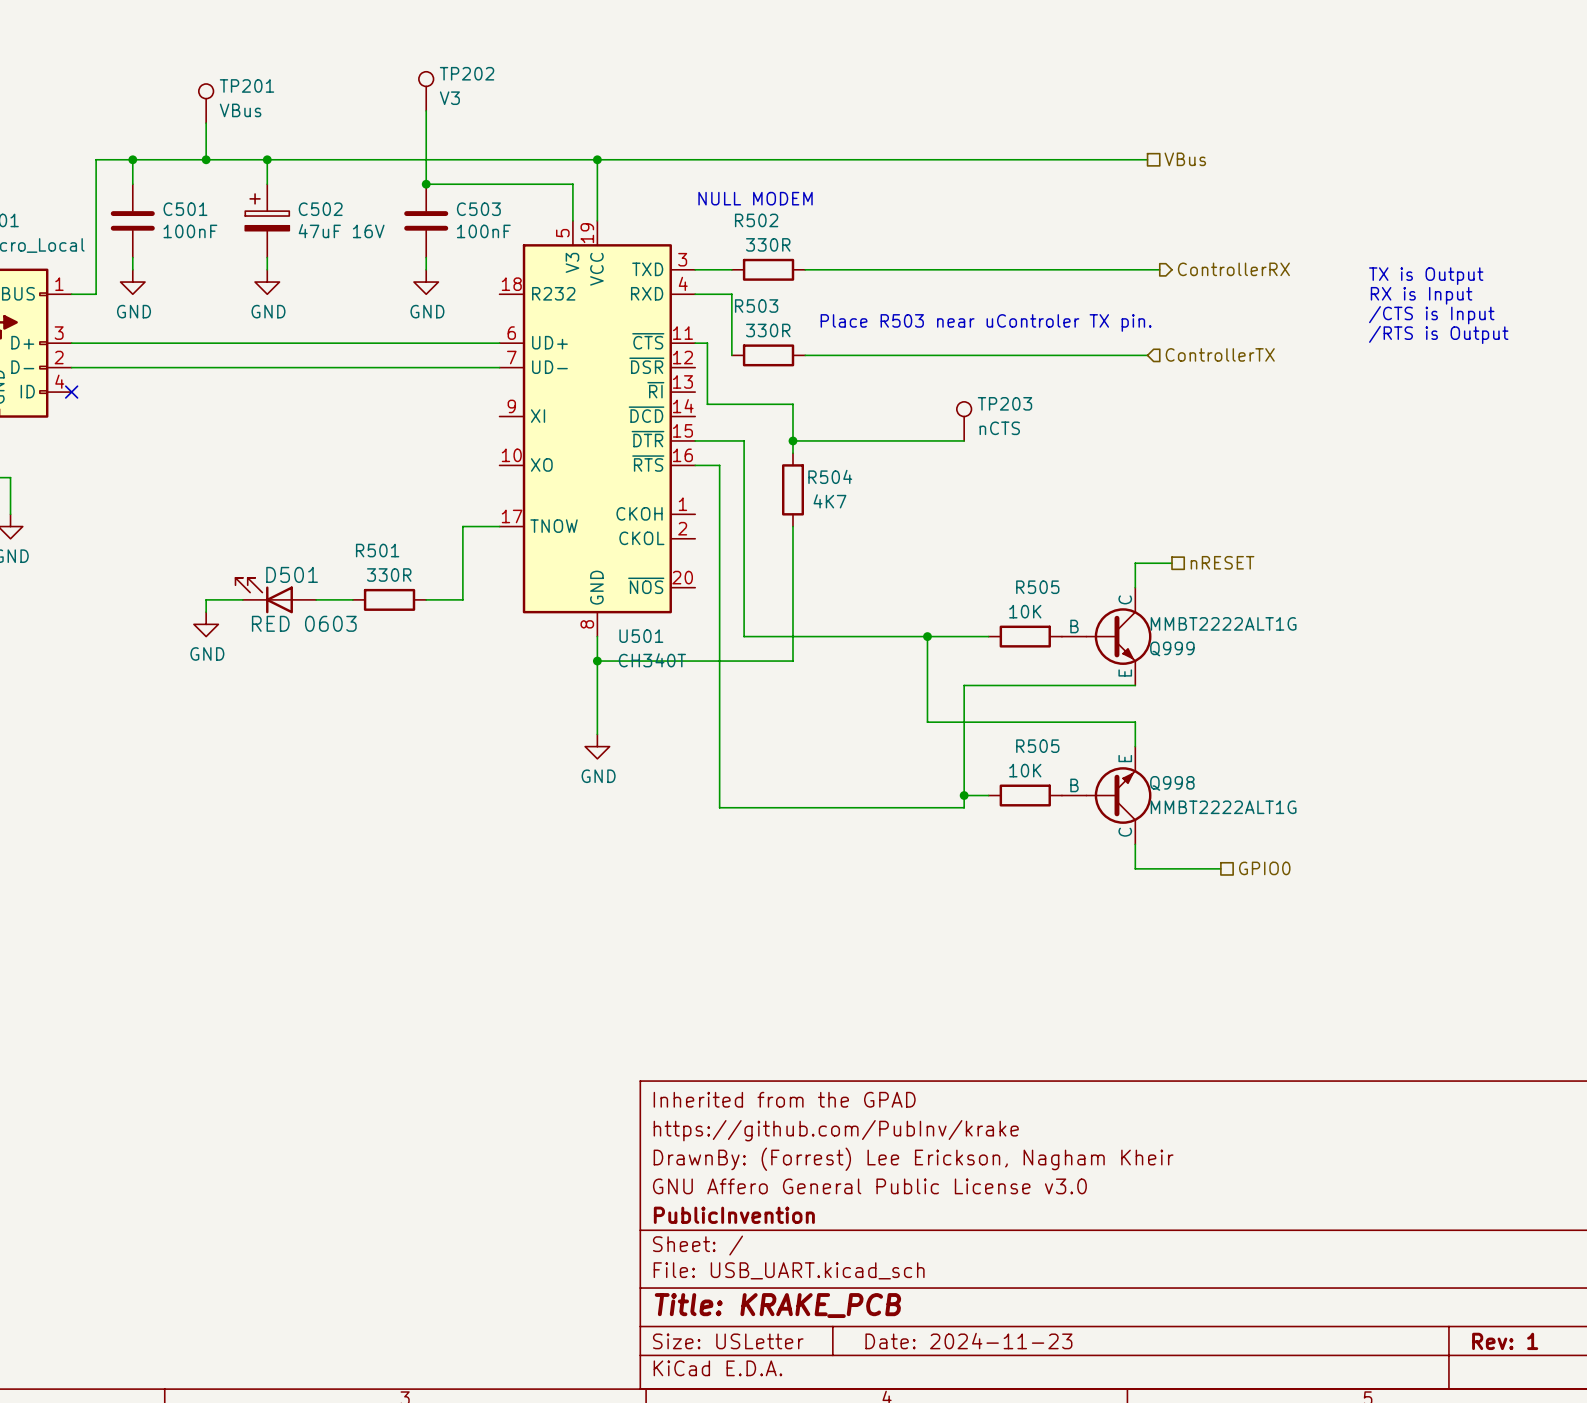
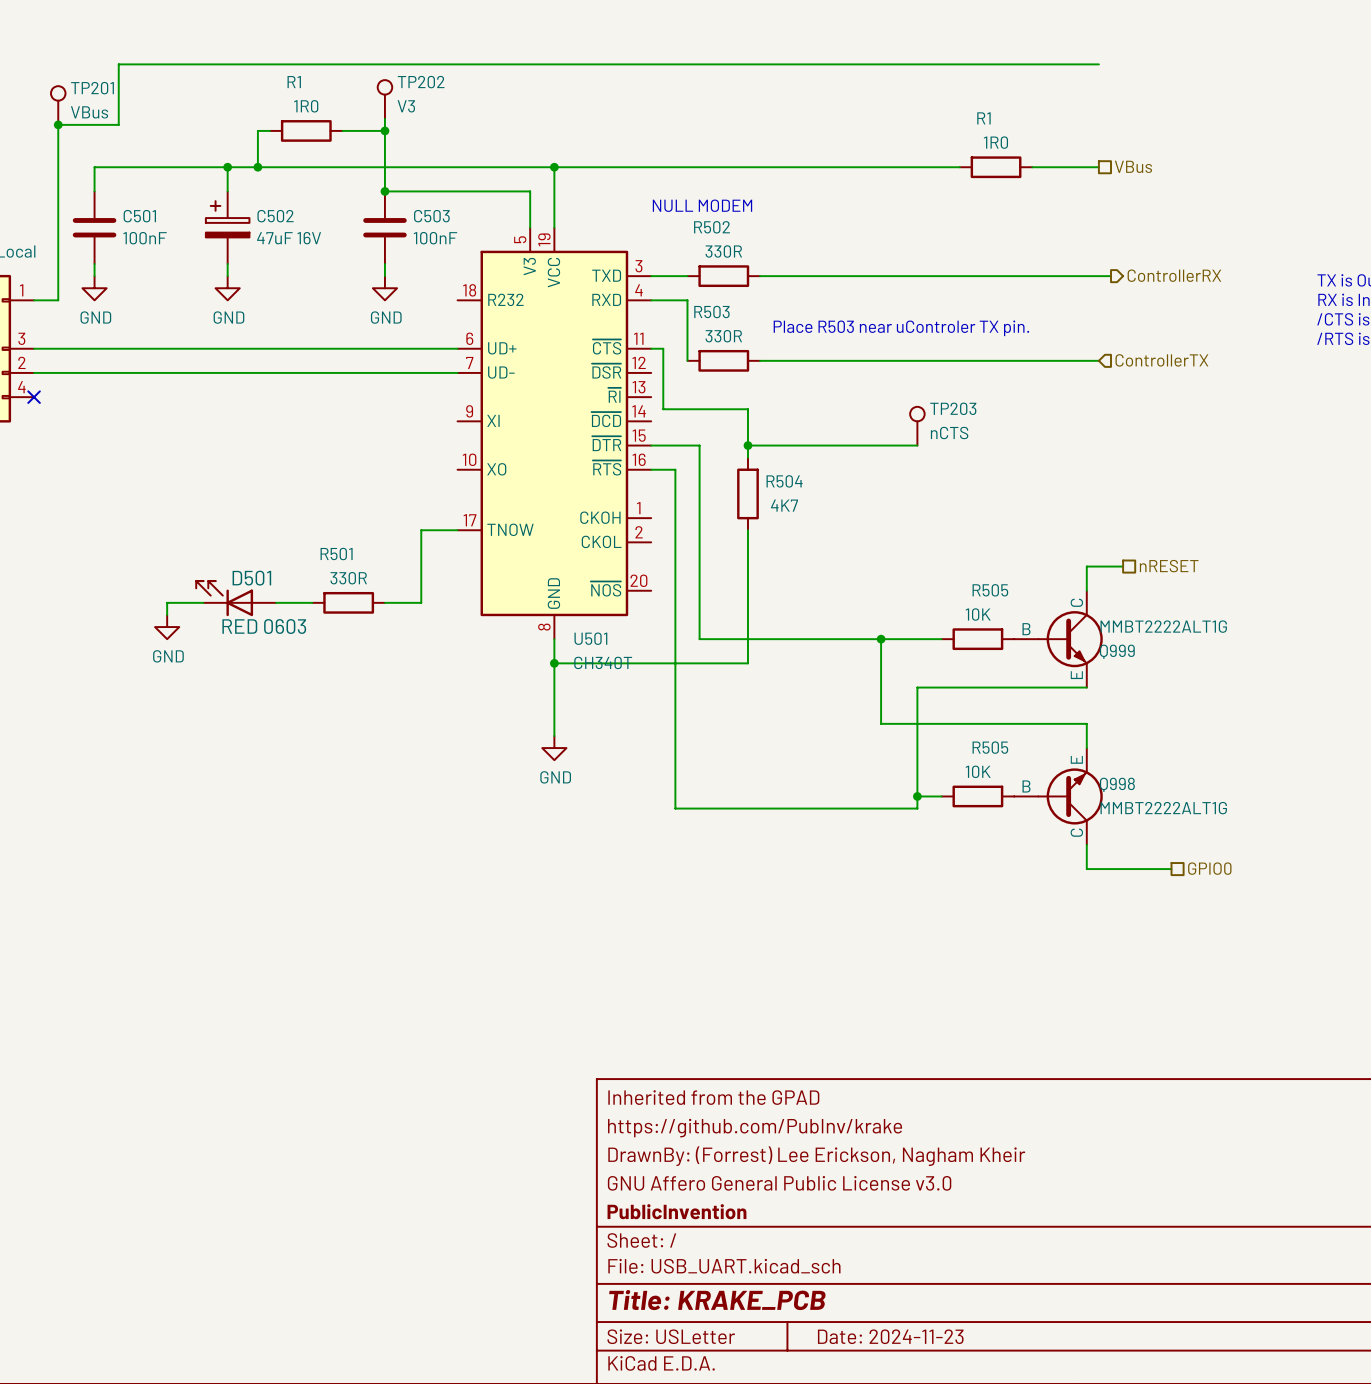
TP201 position: (206, 103) -> (58, 105)
wire: (206, 123) (206, 159) -> none
wire: none -> (270, 130) (257, 130) (257, 167)
R1: none -> 1R0 (306, 130)
wire: none -> (342, 130) (384, 130)
junction: none -> (384, 130)
wire: (96, 159) (132, 159) -> (58, 167) (58, 124) (118, 124) (118, 64) (1098, 64)
junction position: (132, 159) -> (58, 124)
junction: (206, 159) -> none
junction: none -> (257, 167)
wire: (1006, 159) (1080, 159) -> none
R1: none -> 1R0 (996, 167)

